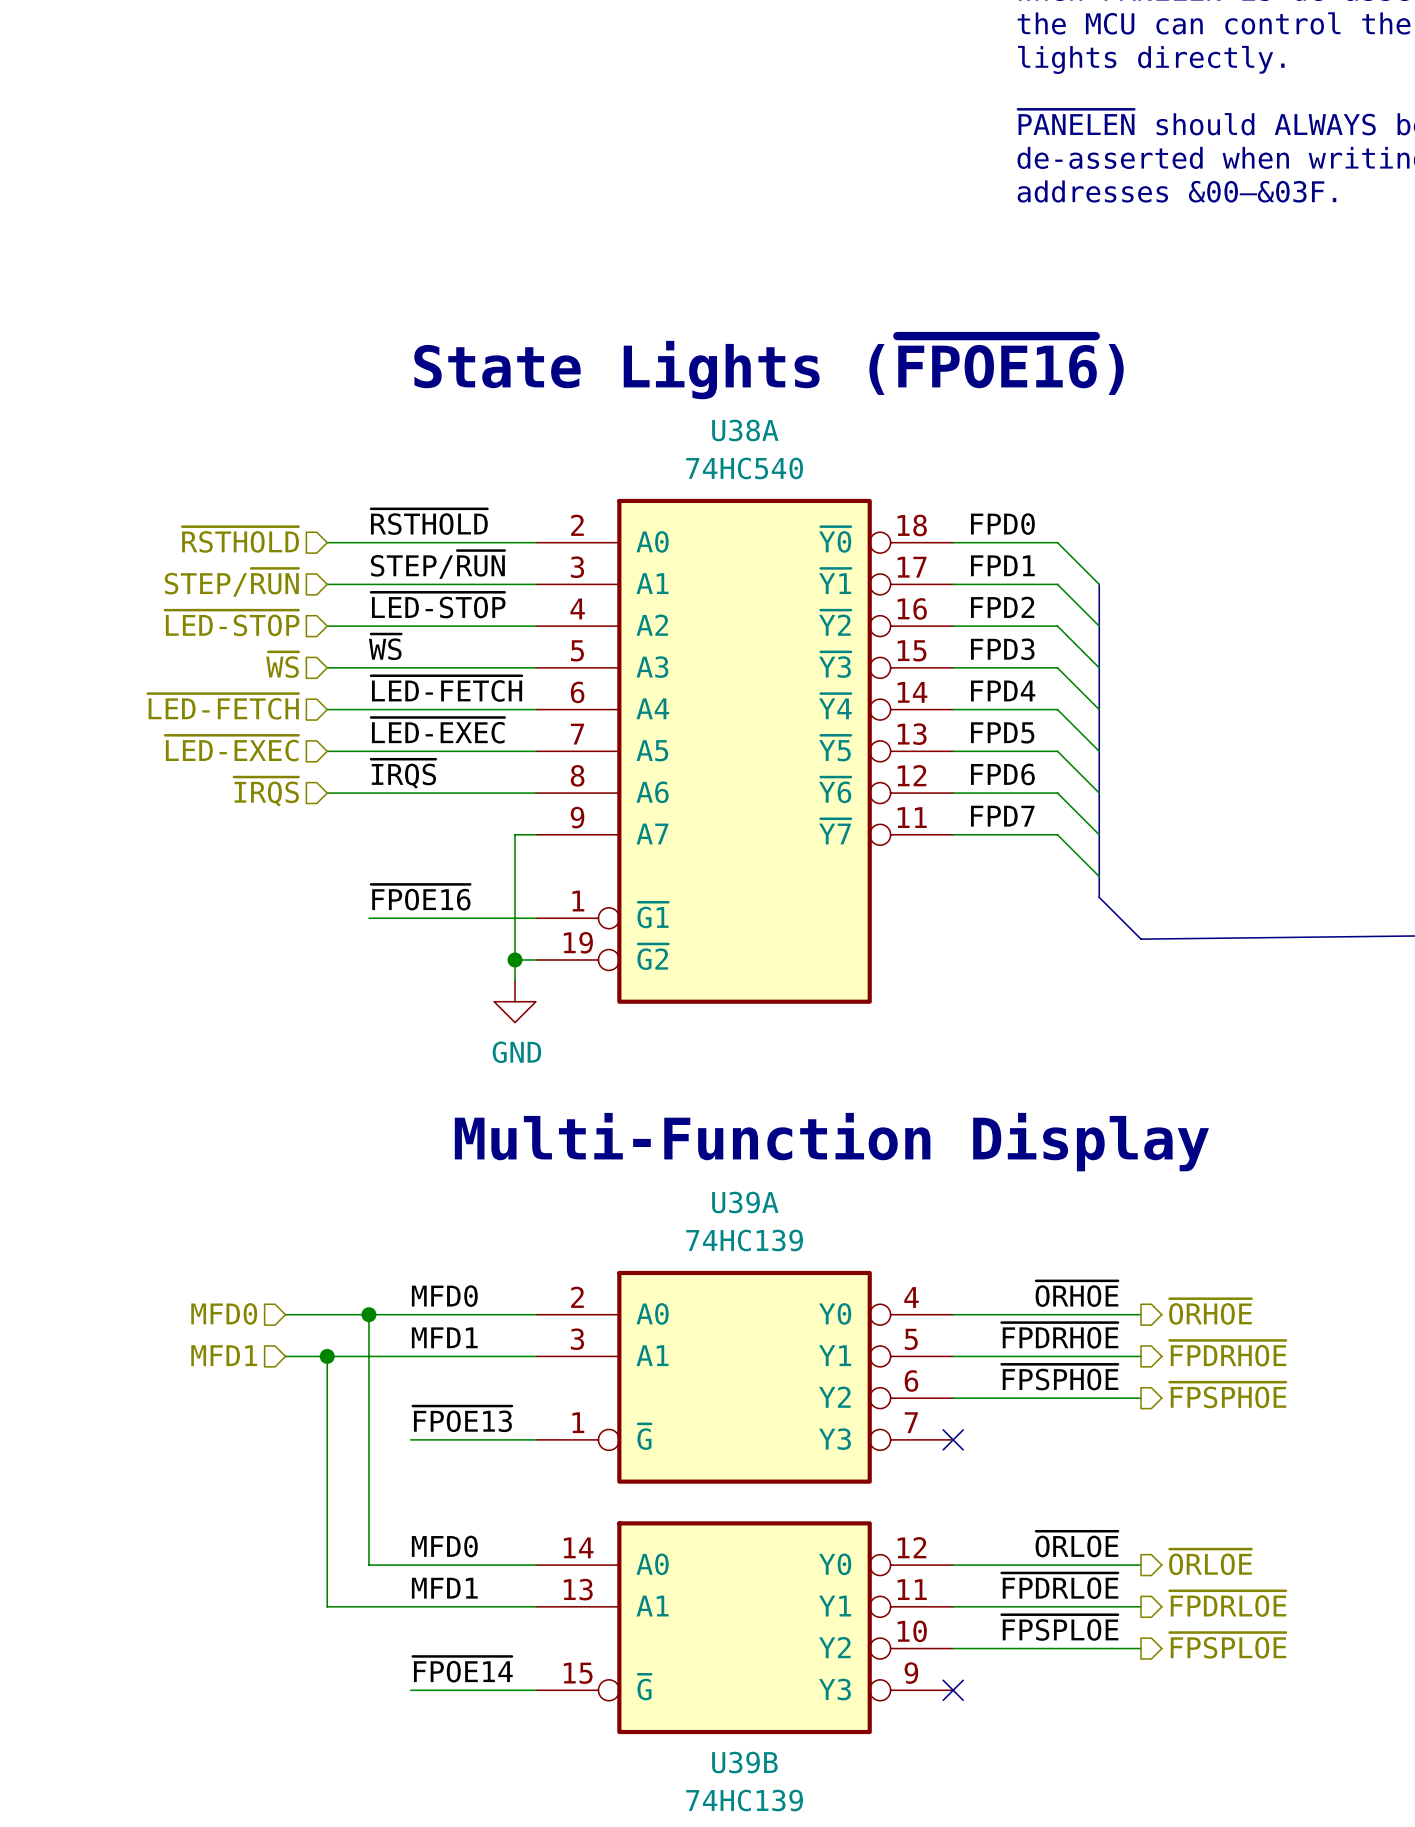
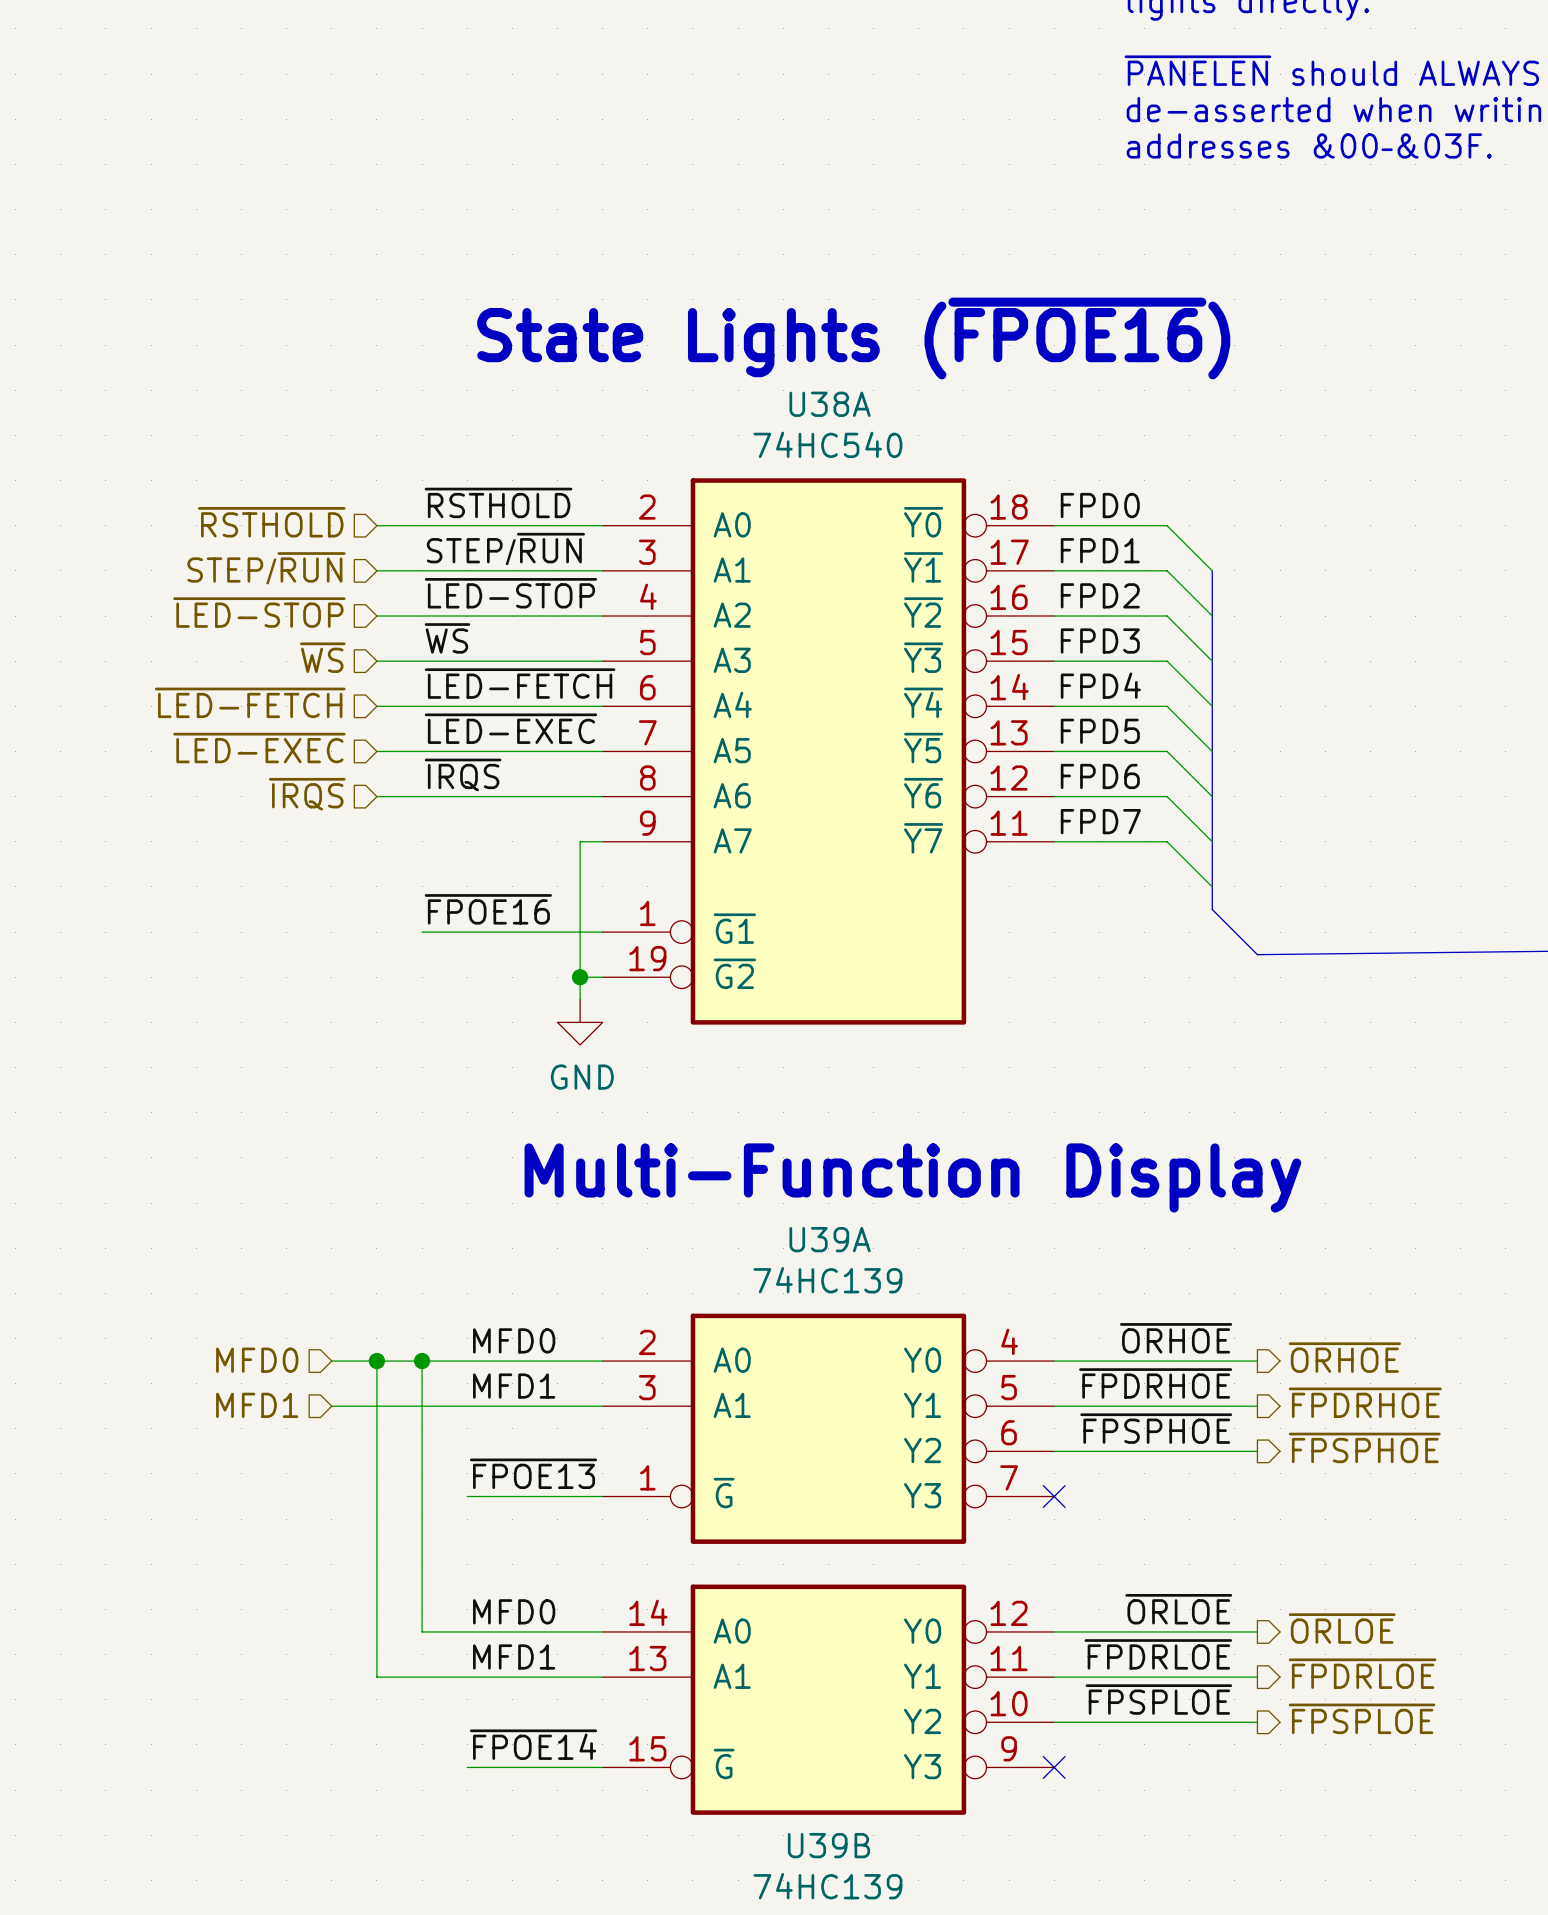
wire: none -> (376, 1361) (376, 1406)
junction position: (327, 1356) -> (376, 1361)

